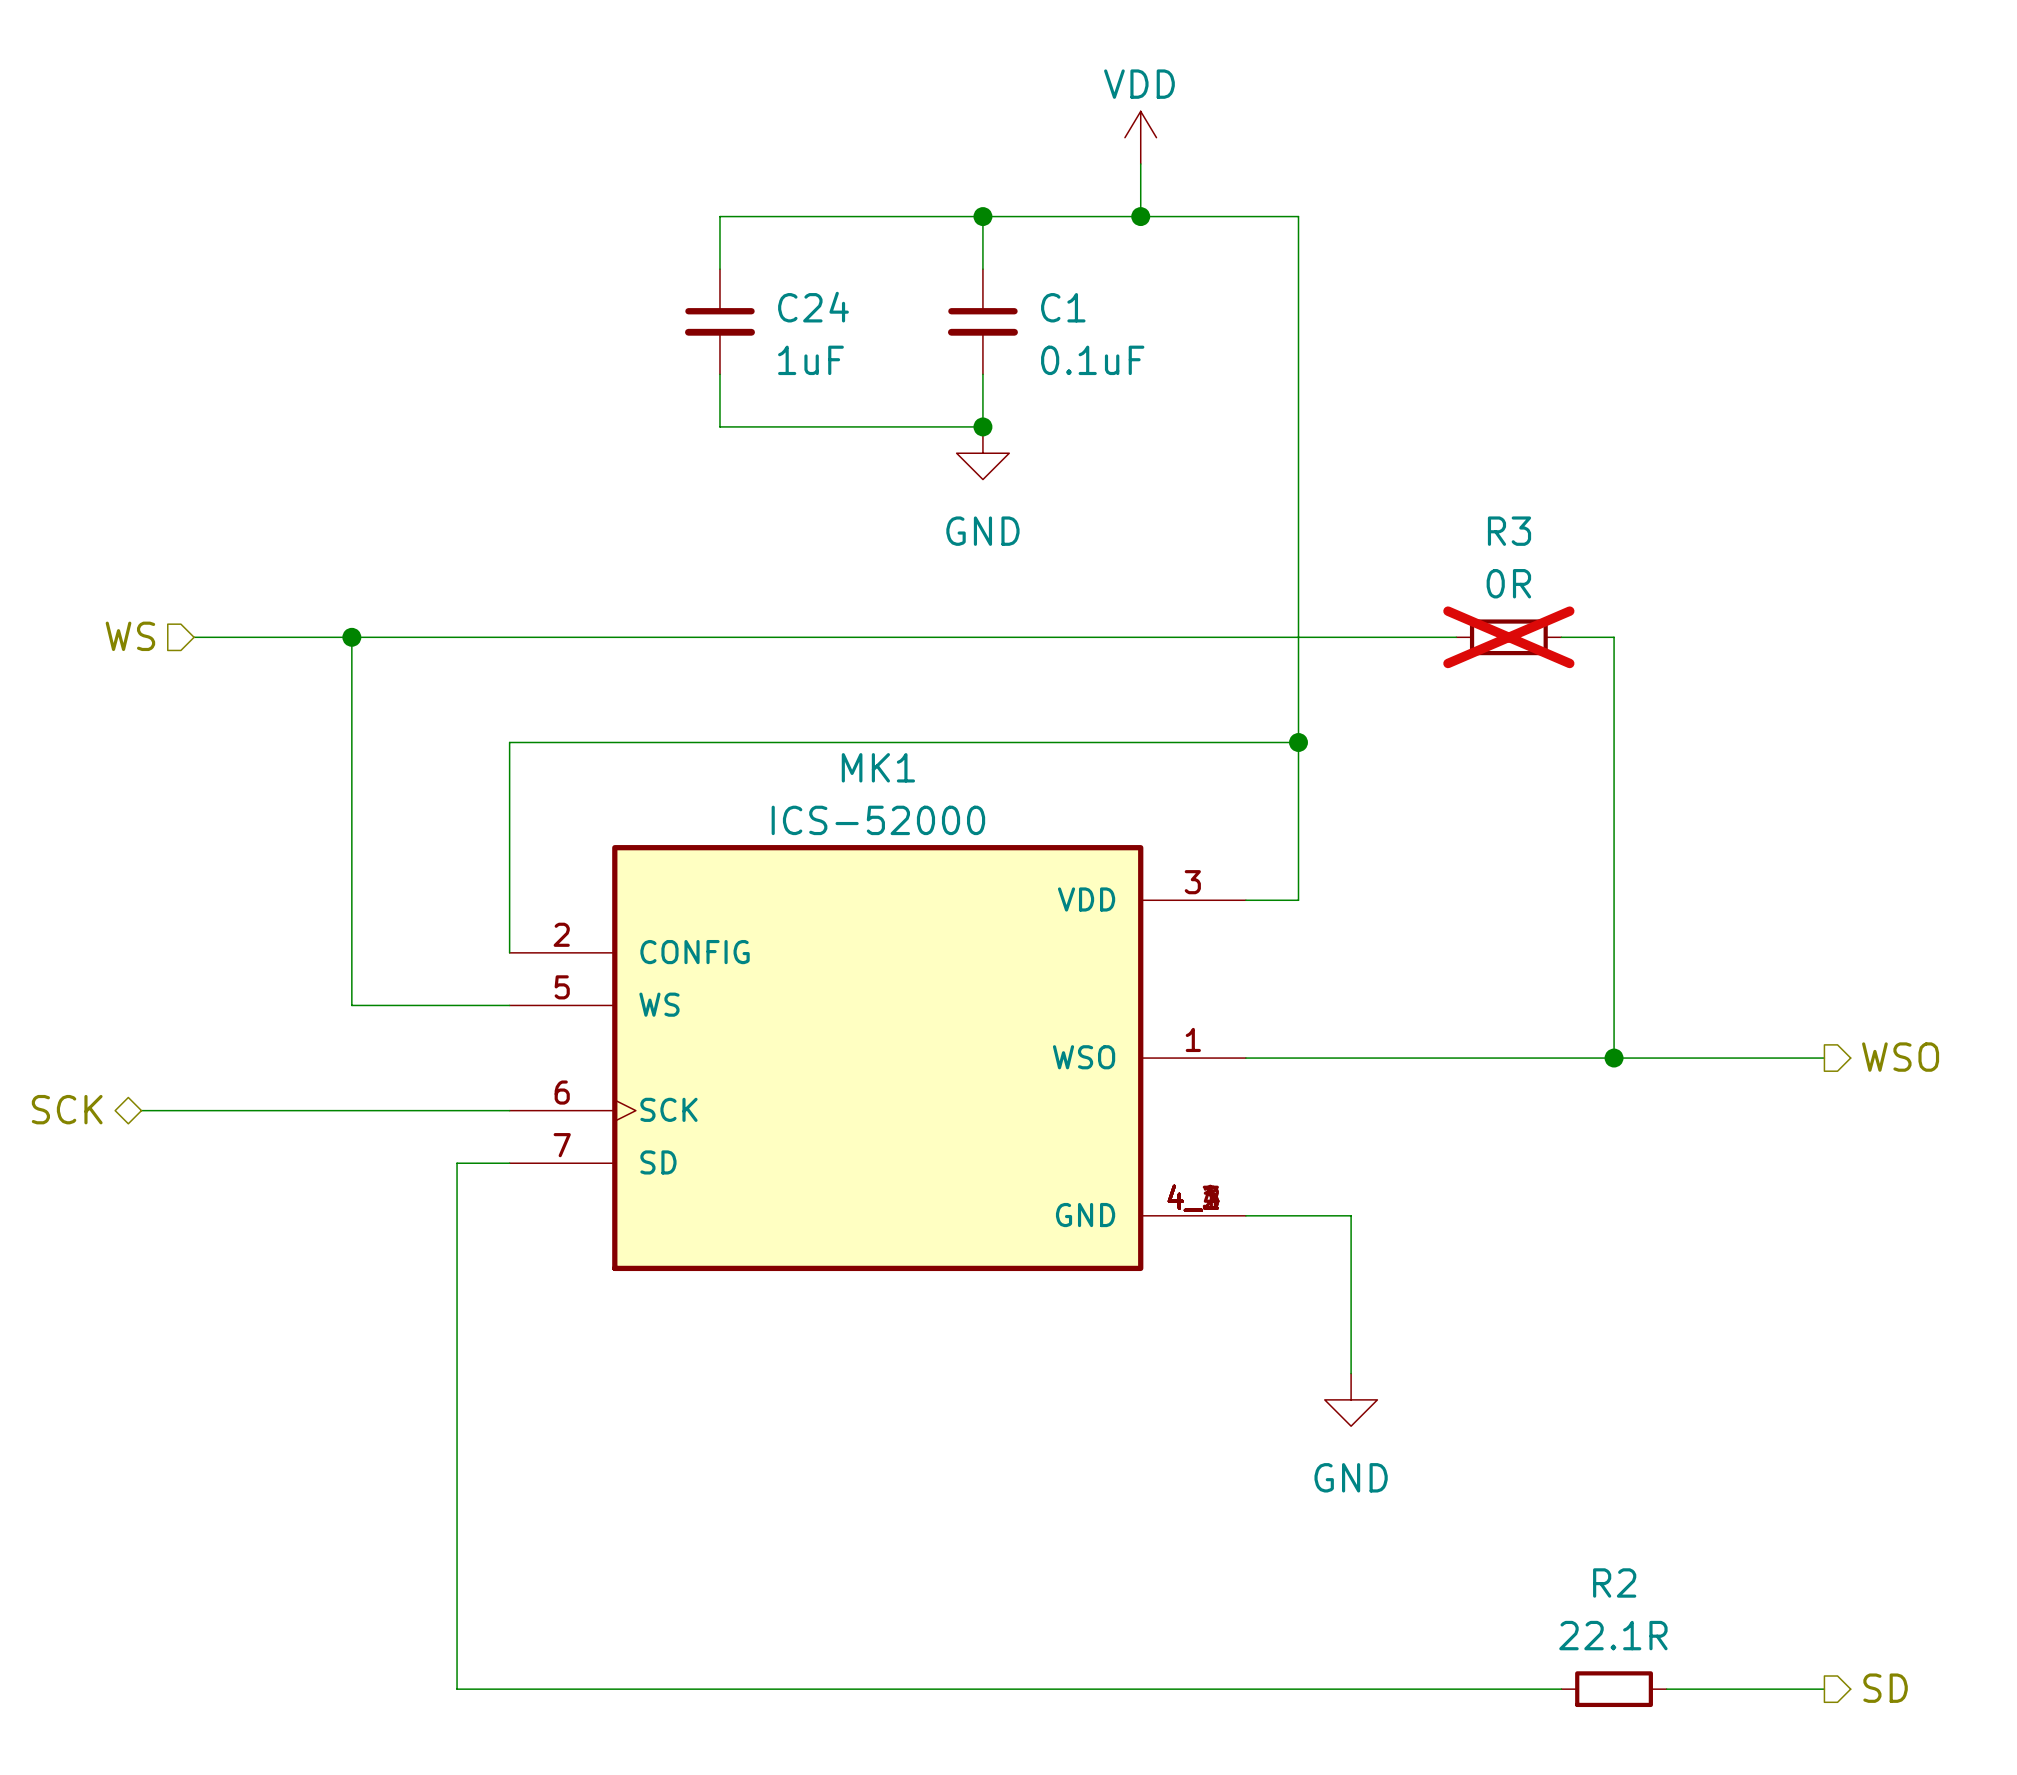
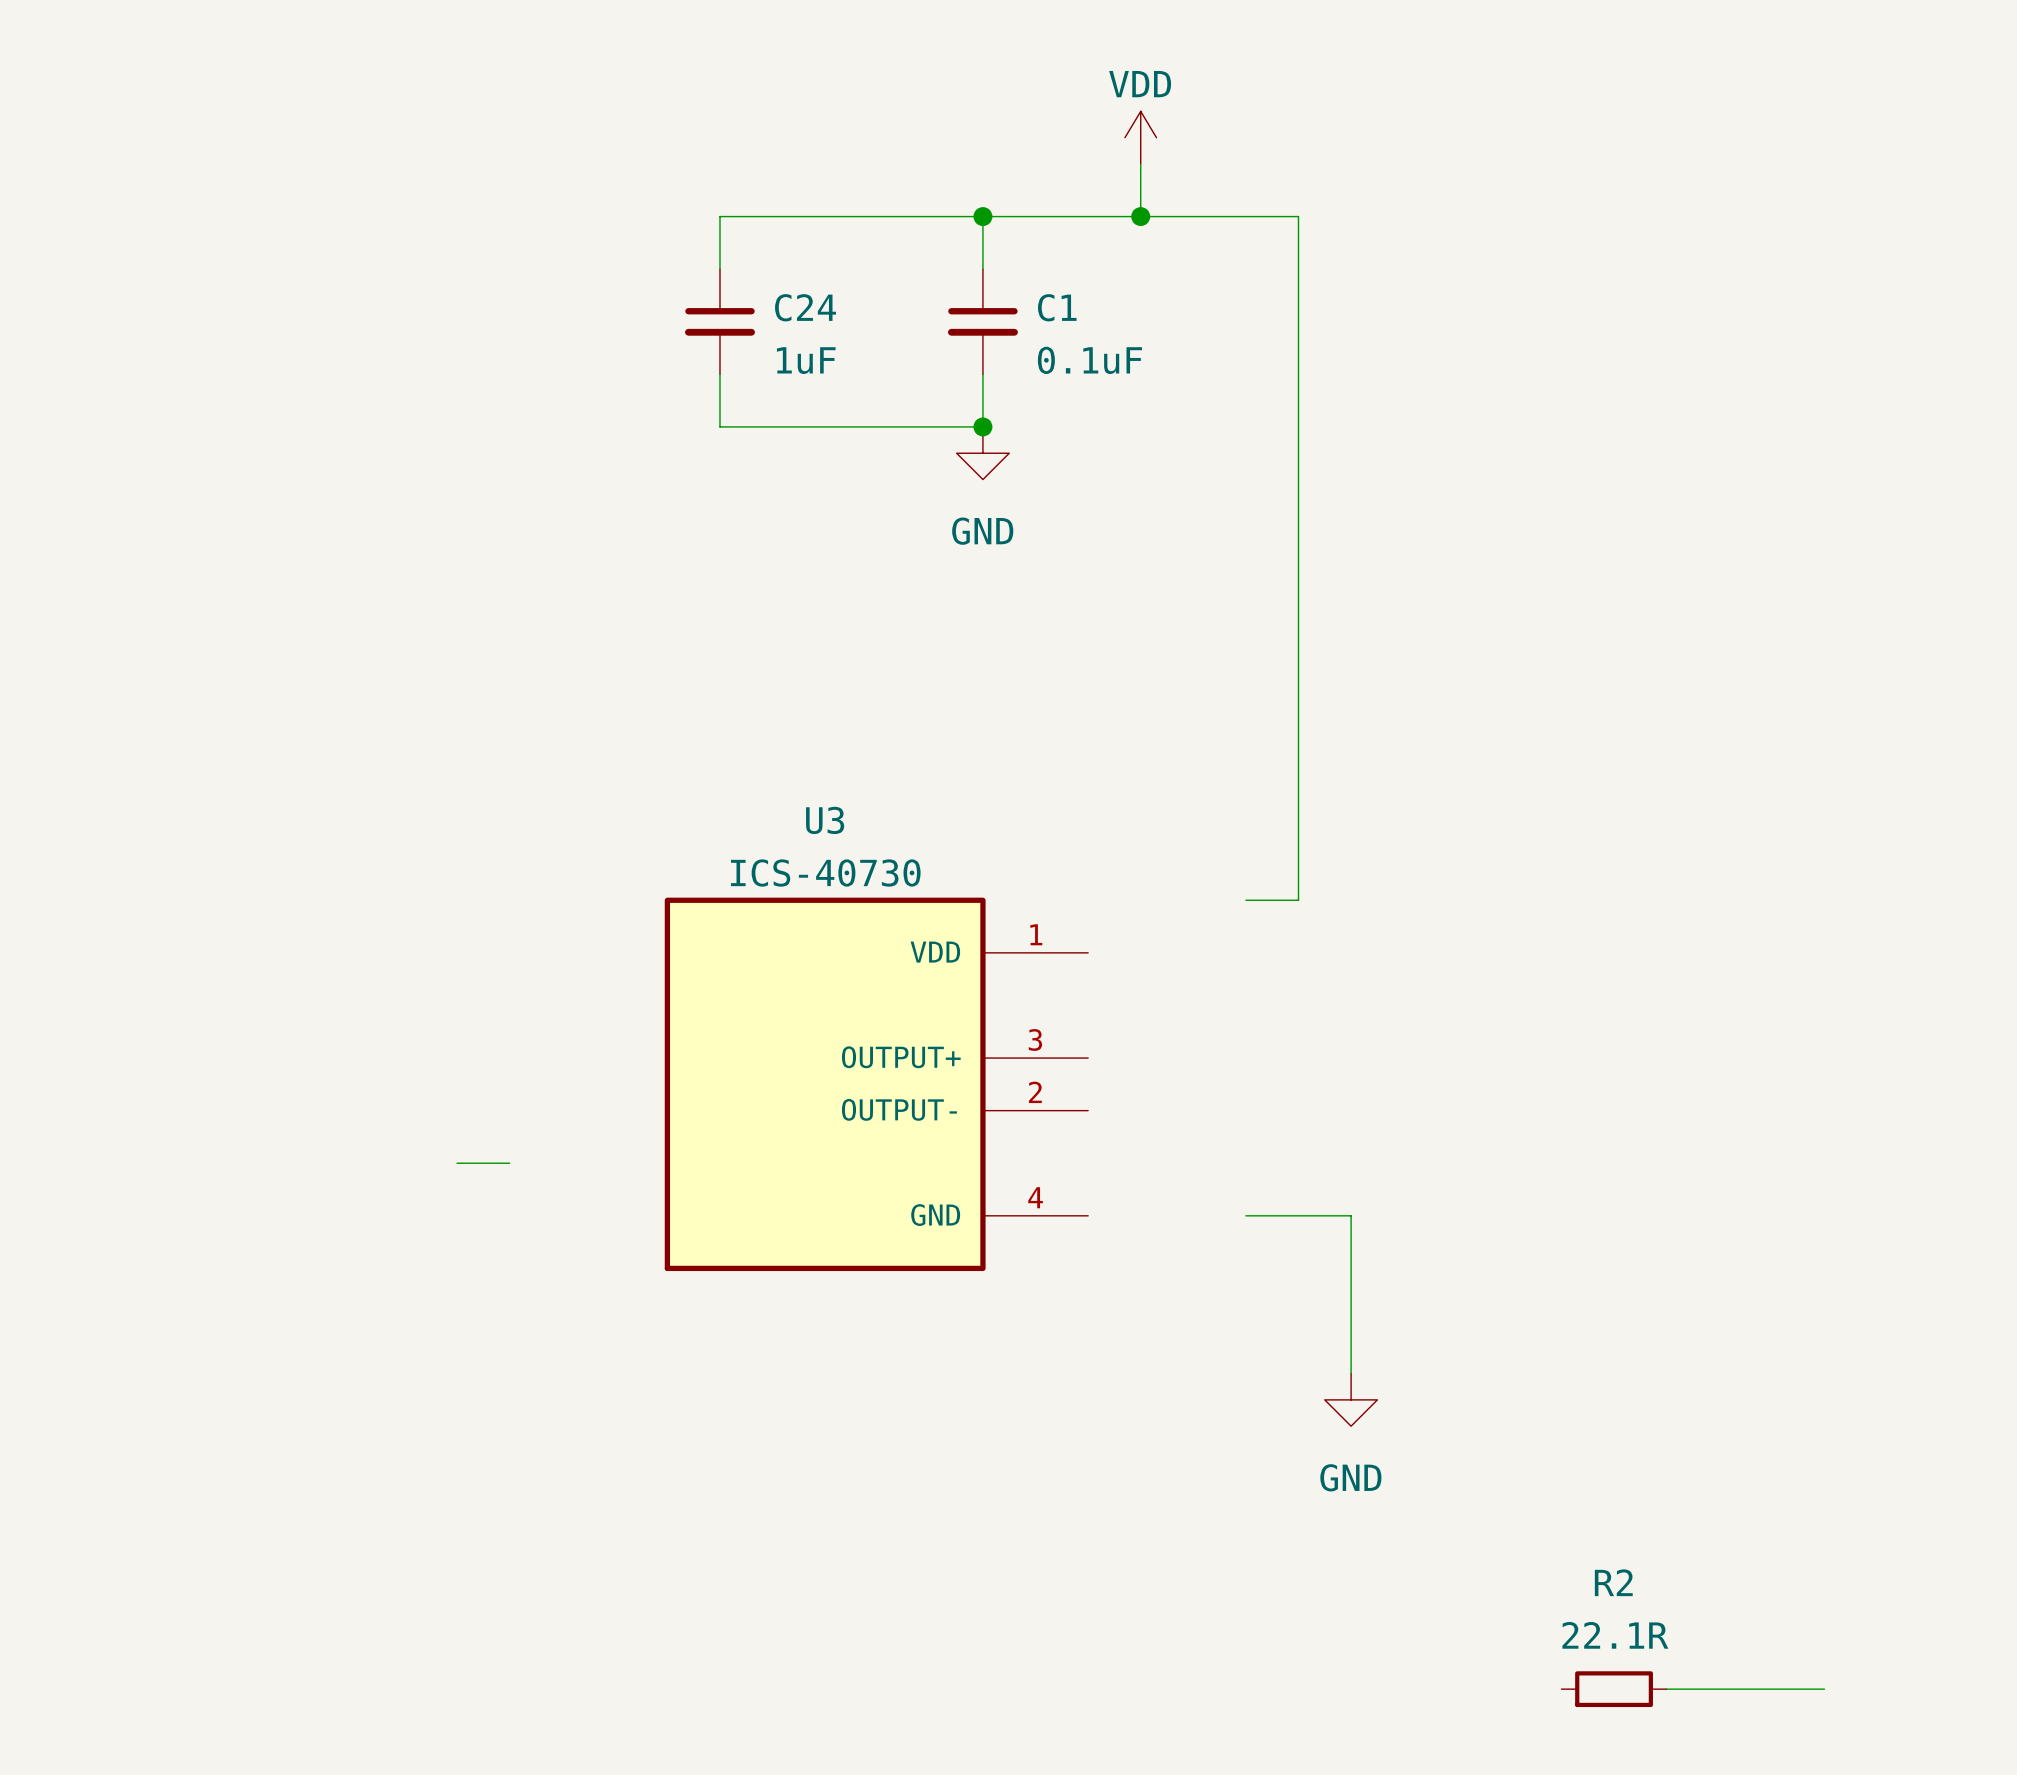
hierarchical label: WS (130, 636) -> none
wire: (194, 637) (1456, 637) -> none
wire: (351, 637) (351, 1005) (509, 1005) -> none
junction: (351, 637) -> none
R3: 0R (1508, 637) -> none
wire: (1561, 637) (1614, 637) (1614, 1058) -> none
wire: (1298, 742) (509, 742) (509, 952) -> none
junction: (1298, 742) -> none
hierarchical label: WSO (1900, 1057) -> none
MK1: ICS-52000 (877, 1058) -> none
wire: (1245, 1058) (1824, 1058) -> none
junction: (1614, 1058) -> none
U3: none -> ICS-40730 (876, 1084)
hierarchical label: SCK (67, 1109) -> none
wire: (141, 1110) (509, 1110) -> none
wire: (457, 1163) (457, 1689) (1561, 1689) -> none
hierarchical label: SD (1885, 1688) -> none

